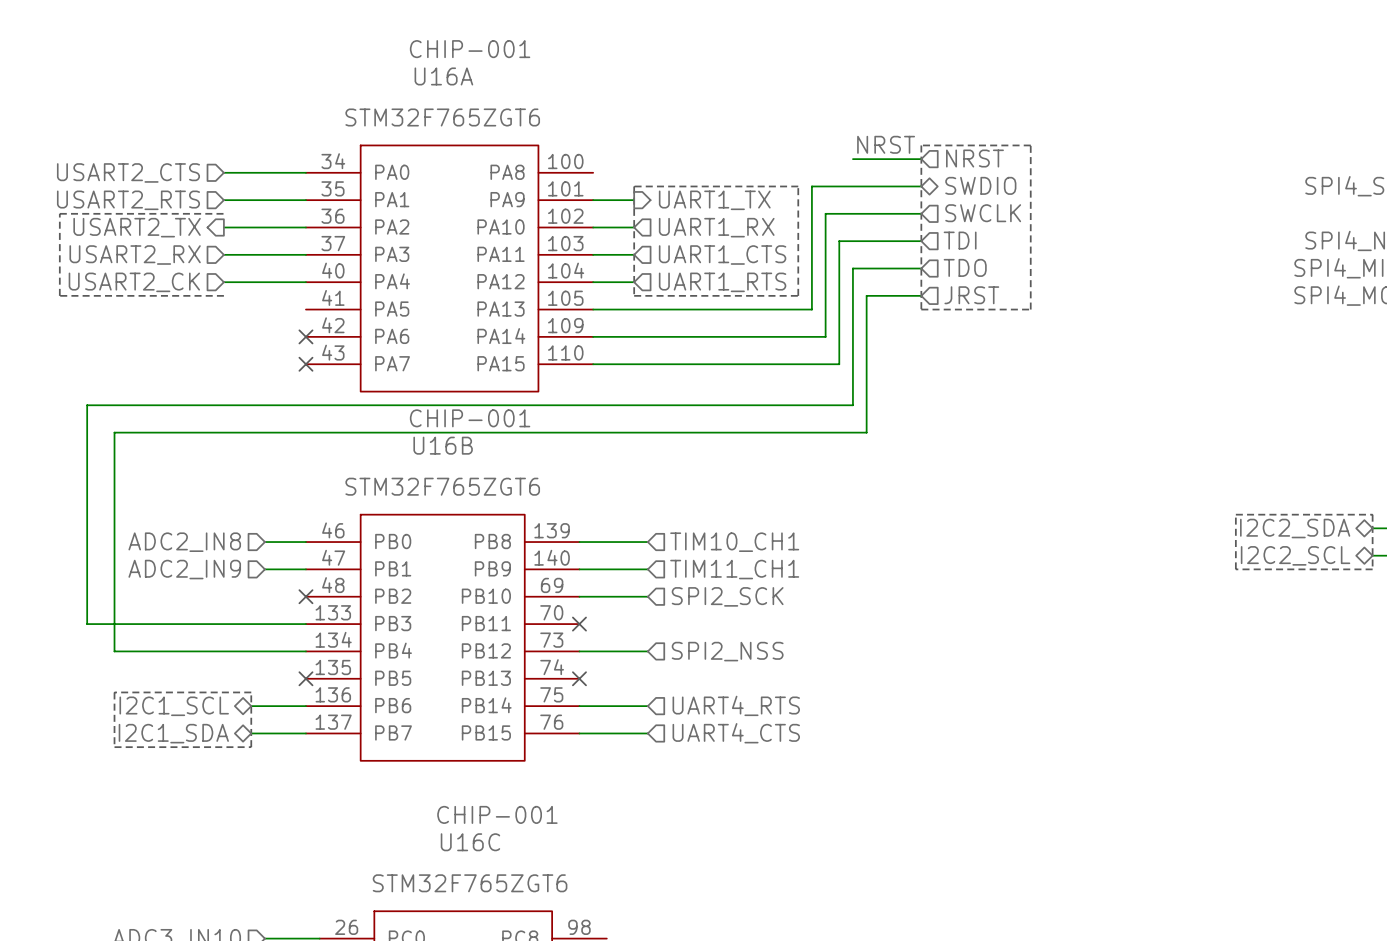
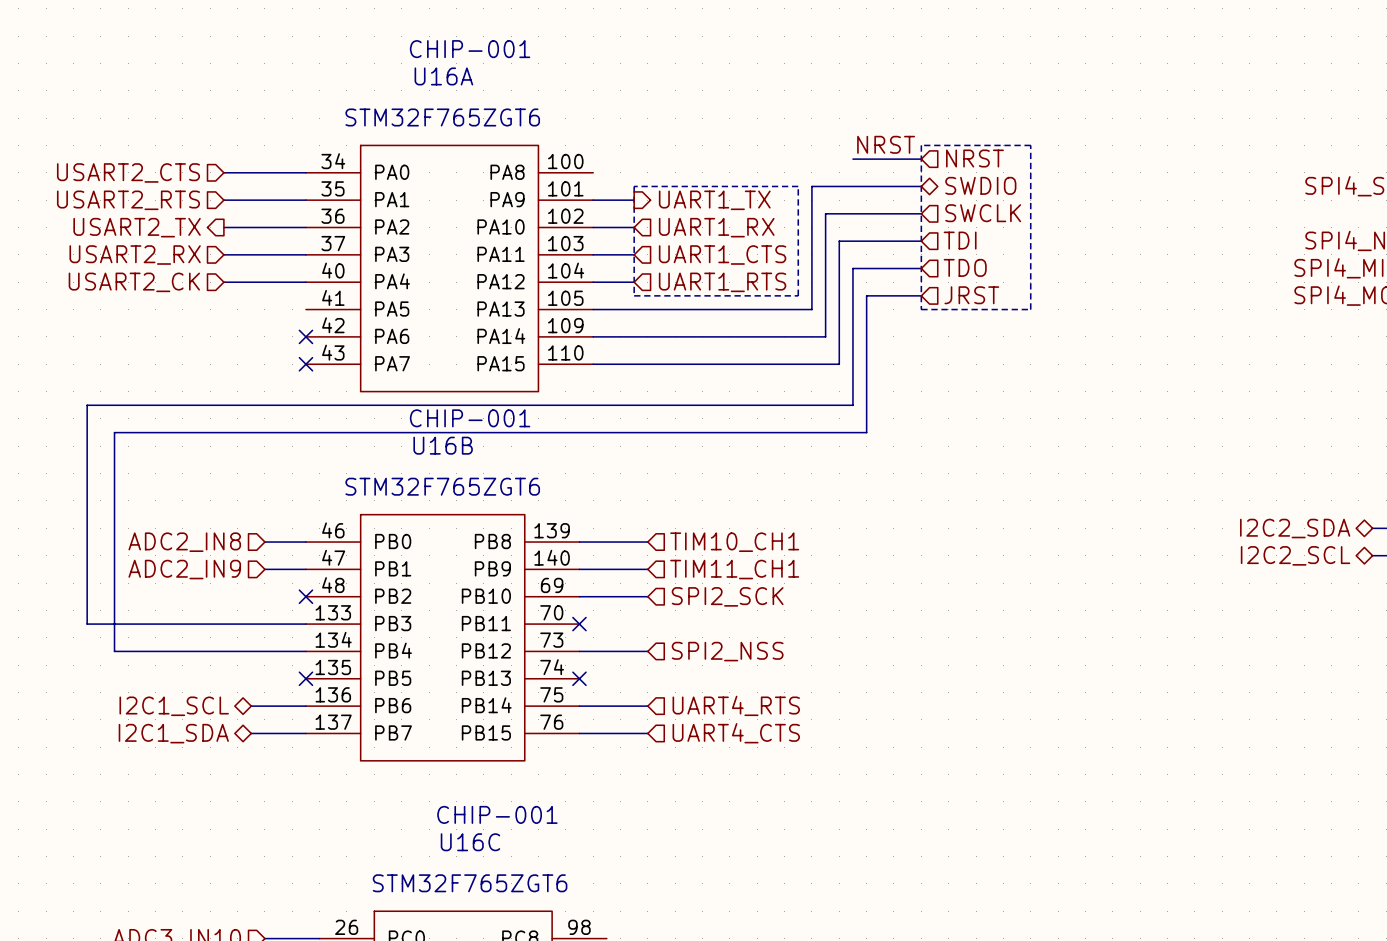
line: (223, 213) (59, 213) (59, 295) (223, 295) -> none
line: (1235, 514) (1372, 514) (1372, 569) (1235, 569) (1235, 514) -> none
line: (114, 692) (114, 747) (251, 747) (251, 692) (114, 692) -> none

